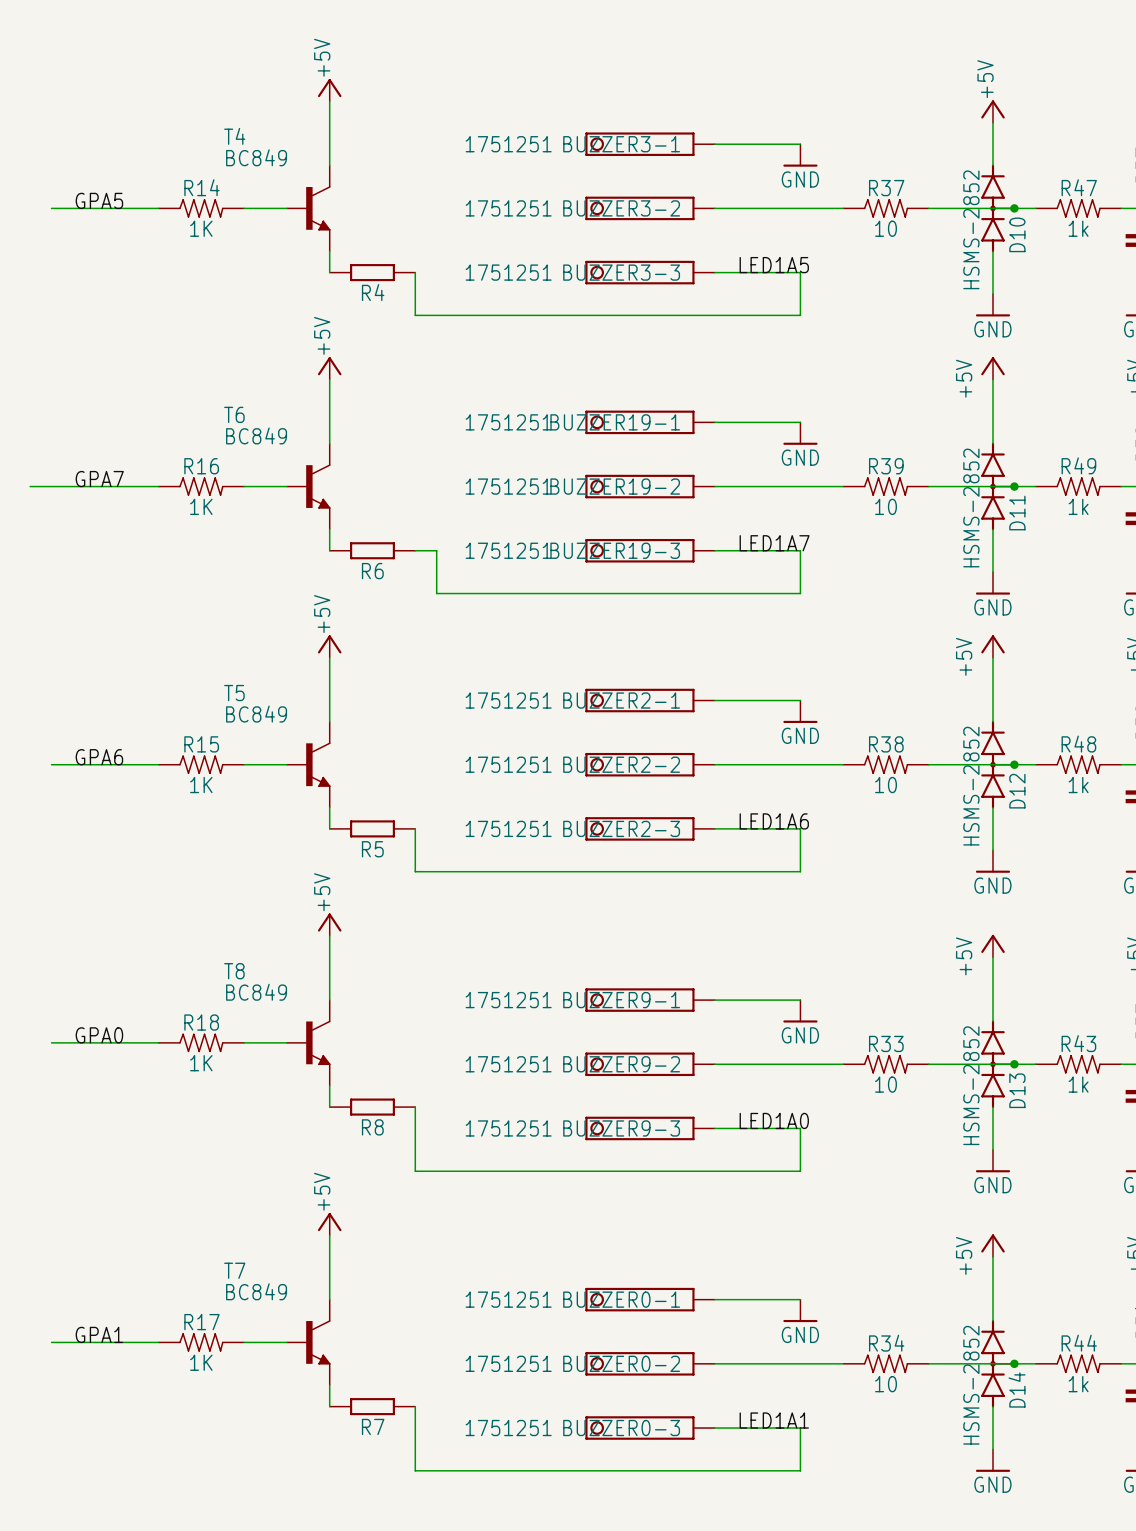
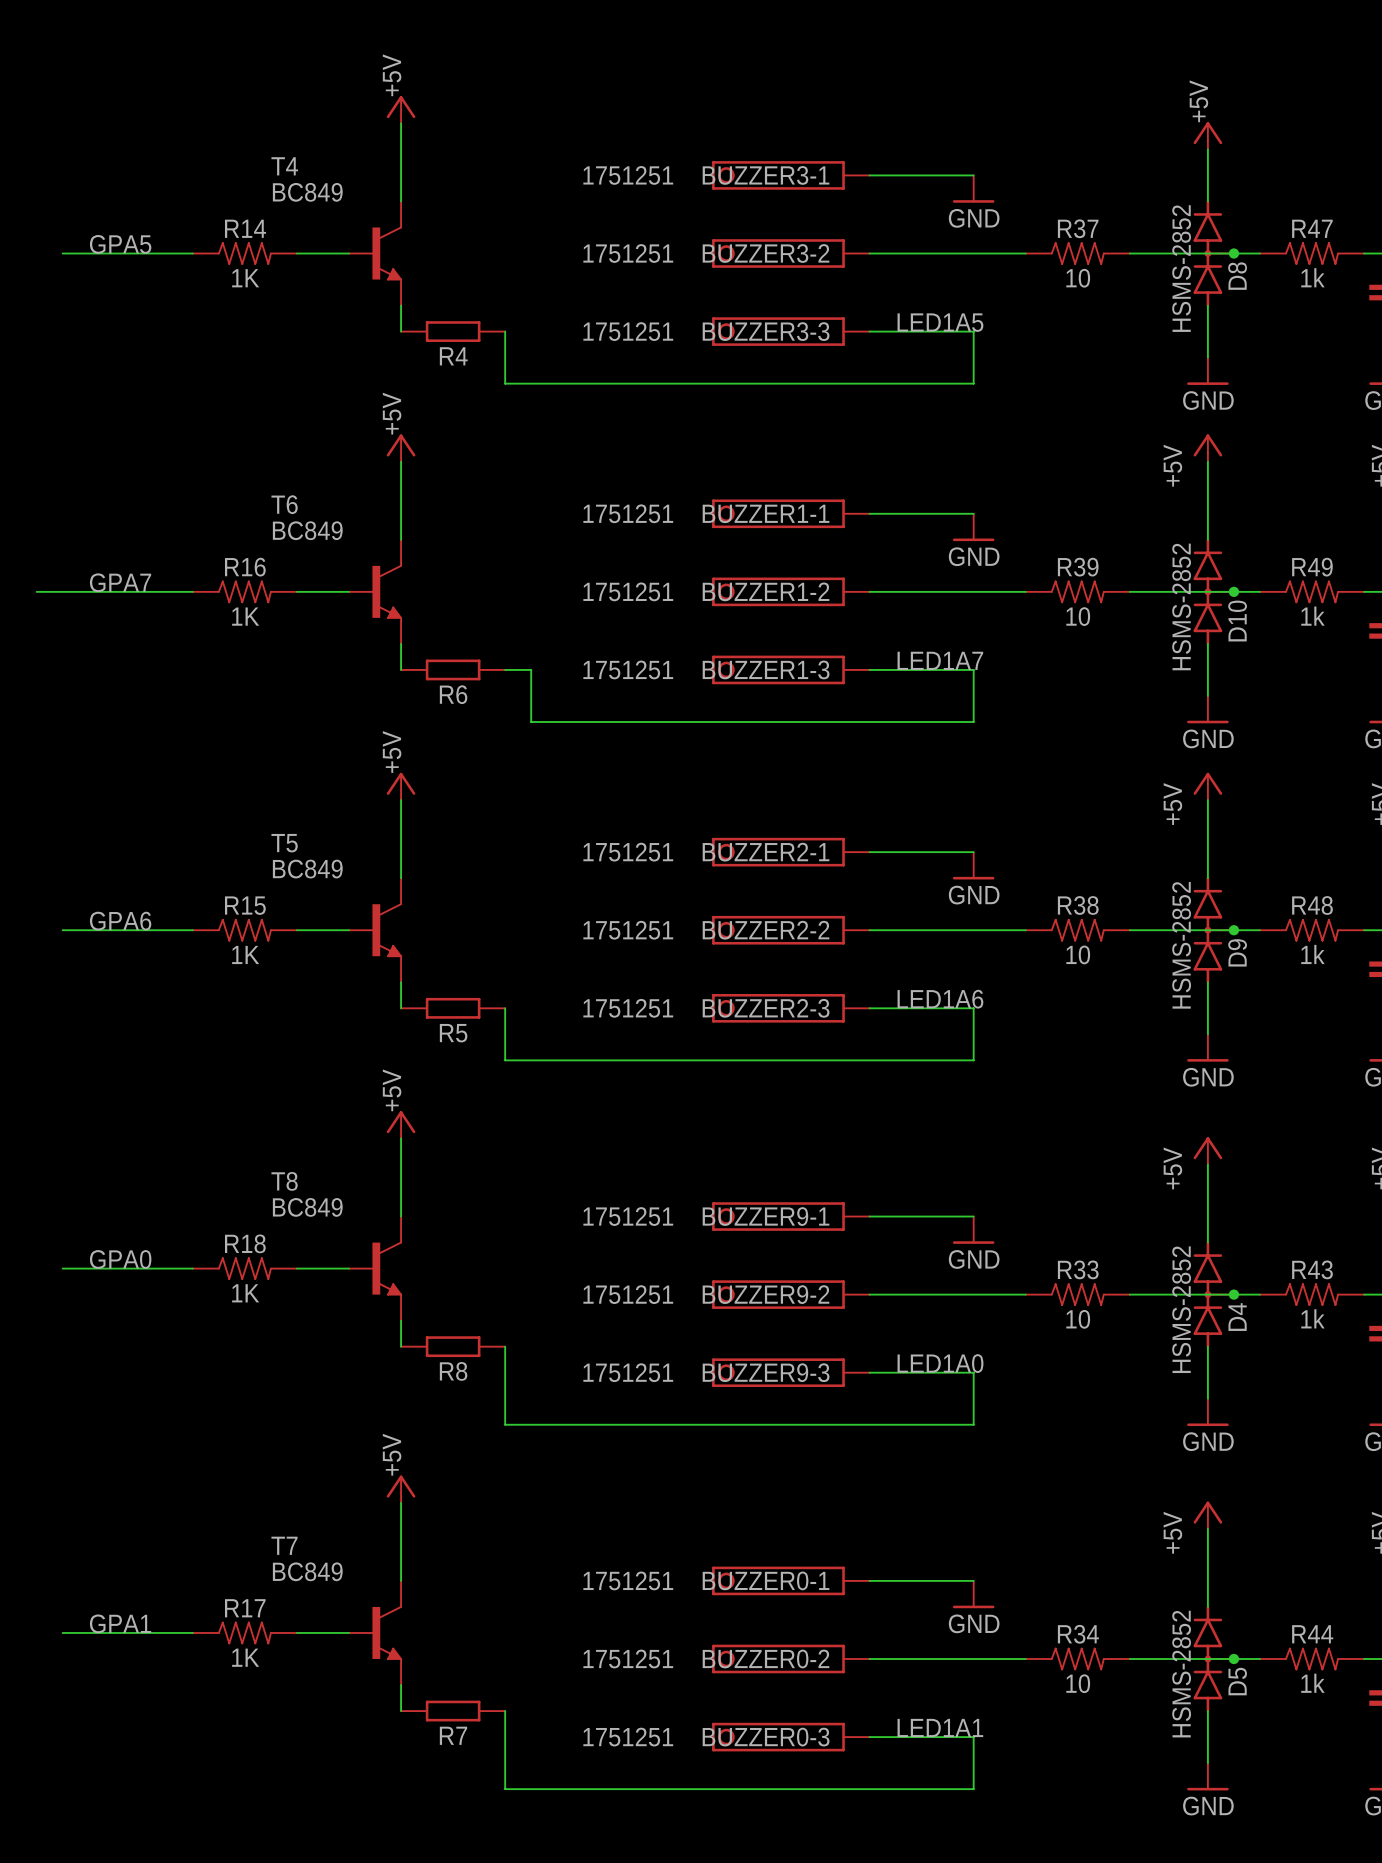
D10 name: D10 (1017, 234) -> D8 (1237, 276)
BUZZER19-1 name: BUZZER19-1 (615, 422) -> BUZZER1-1 (766, 513)
BUZZER19-2 name: BUZZER19-2 (615, 486) -> BUZZER1-2 (766, 591)
D11 name: D11 (1017, 513) -> D10 (1237, 621)
BUZZER19-3 name: BUZZER19-3 (615, 550) -> BUZZER1-3 (766, 669)
D12 name: D12 (1017, 791) -> D9 (1237, 952)
D13 name: D13 (1017, 1090) -> D4 (1237, 1317)
D14 name: D14 (1017, 1389) -> D5 (1237, 1681)

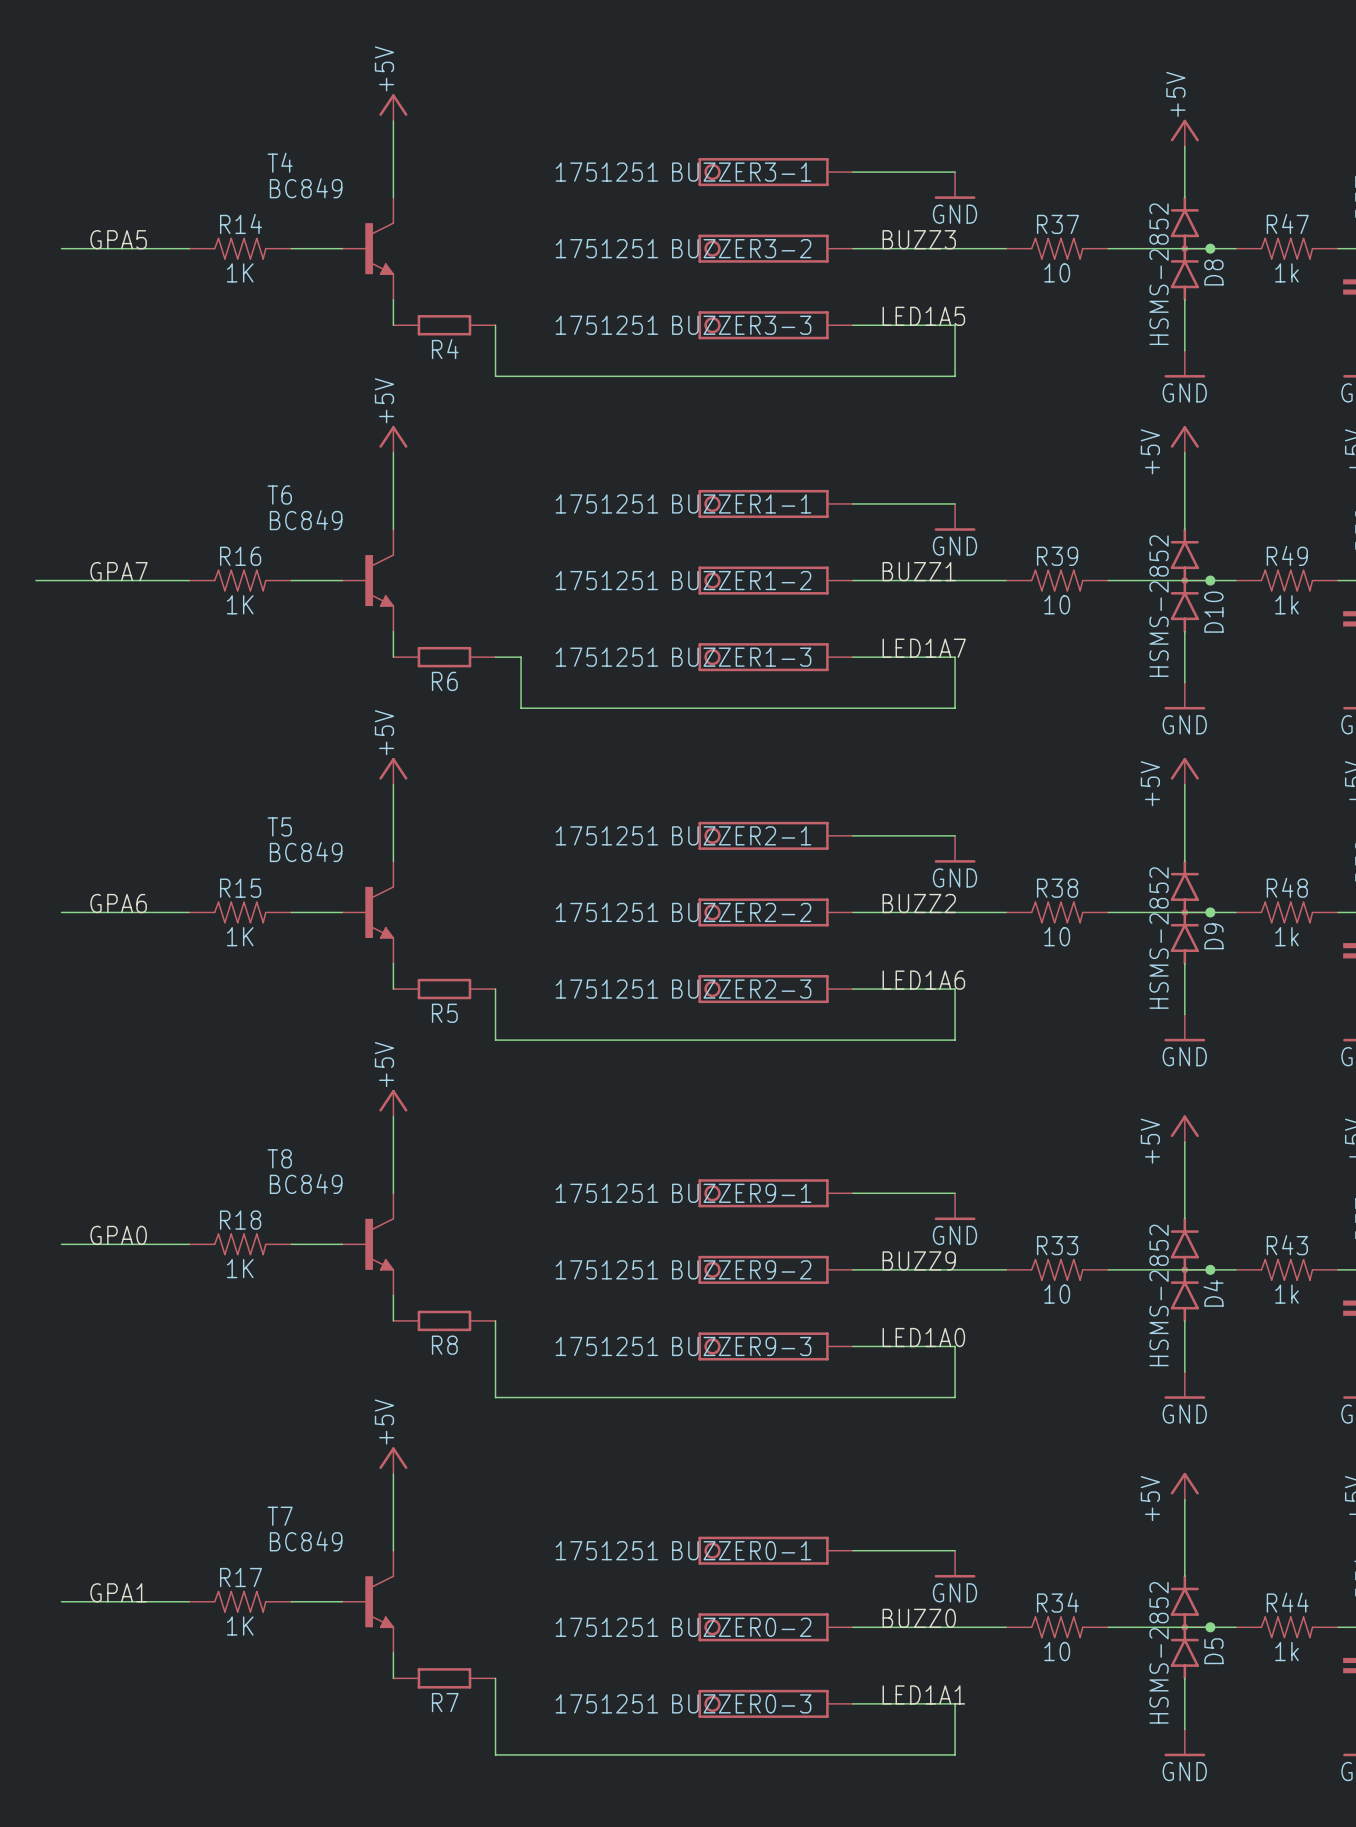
label: none -> BUZZ3 (919, 239)
label: none -> BUZZ1 (919, 571)
label: none -> BUZZ2 (919, 903)
label: none -> BUZZ9 (919, 1260)
label: none -> BUZZ0 (919, 1618)

